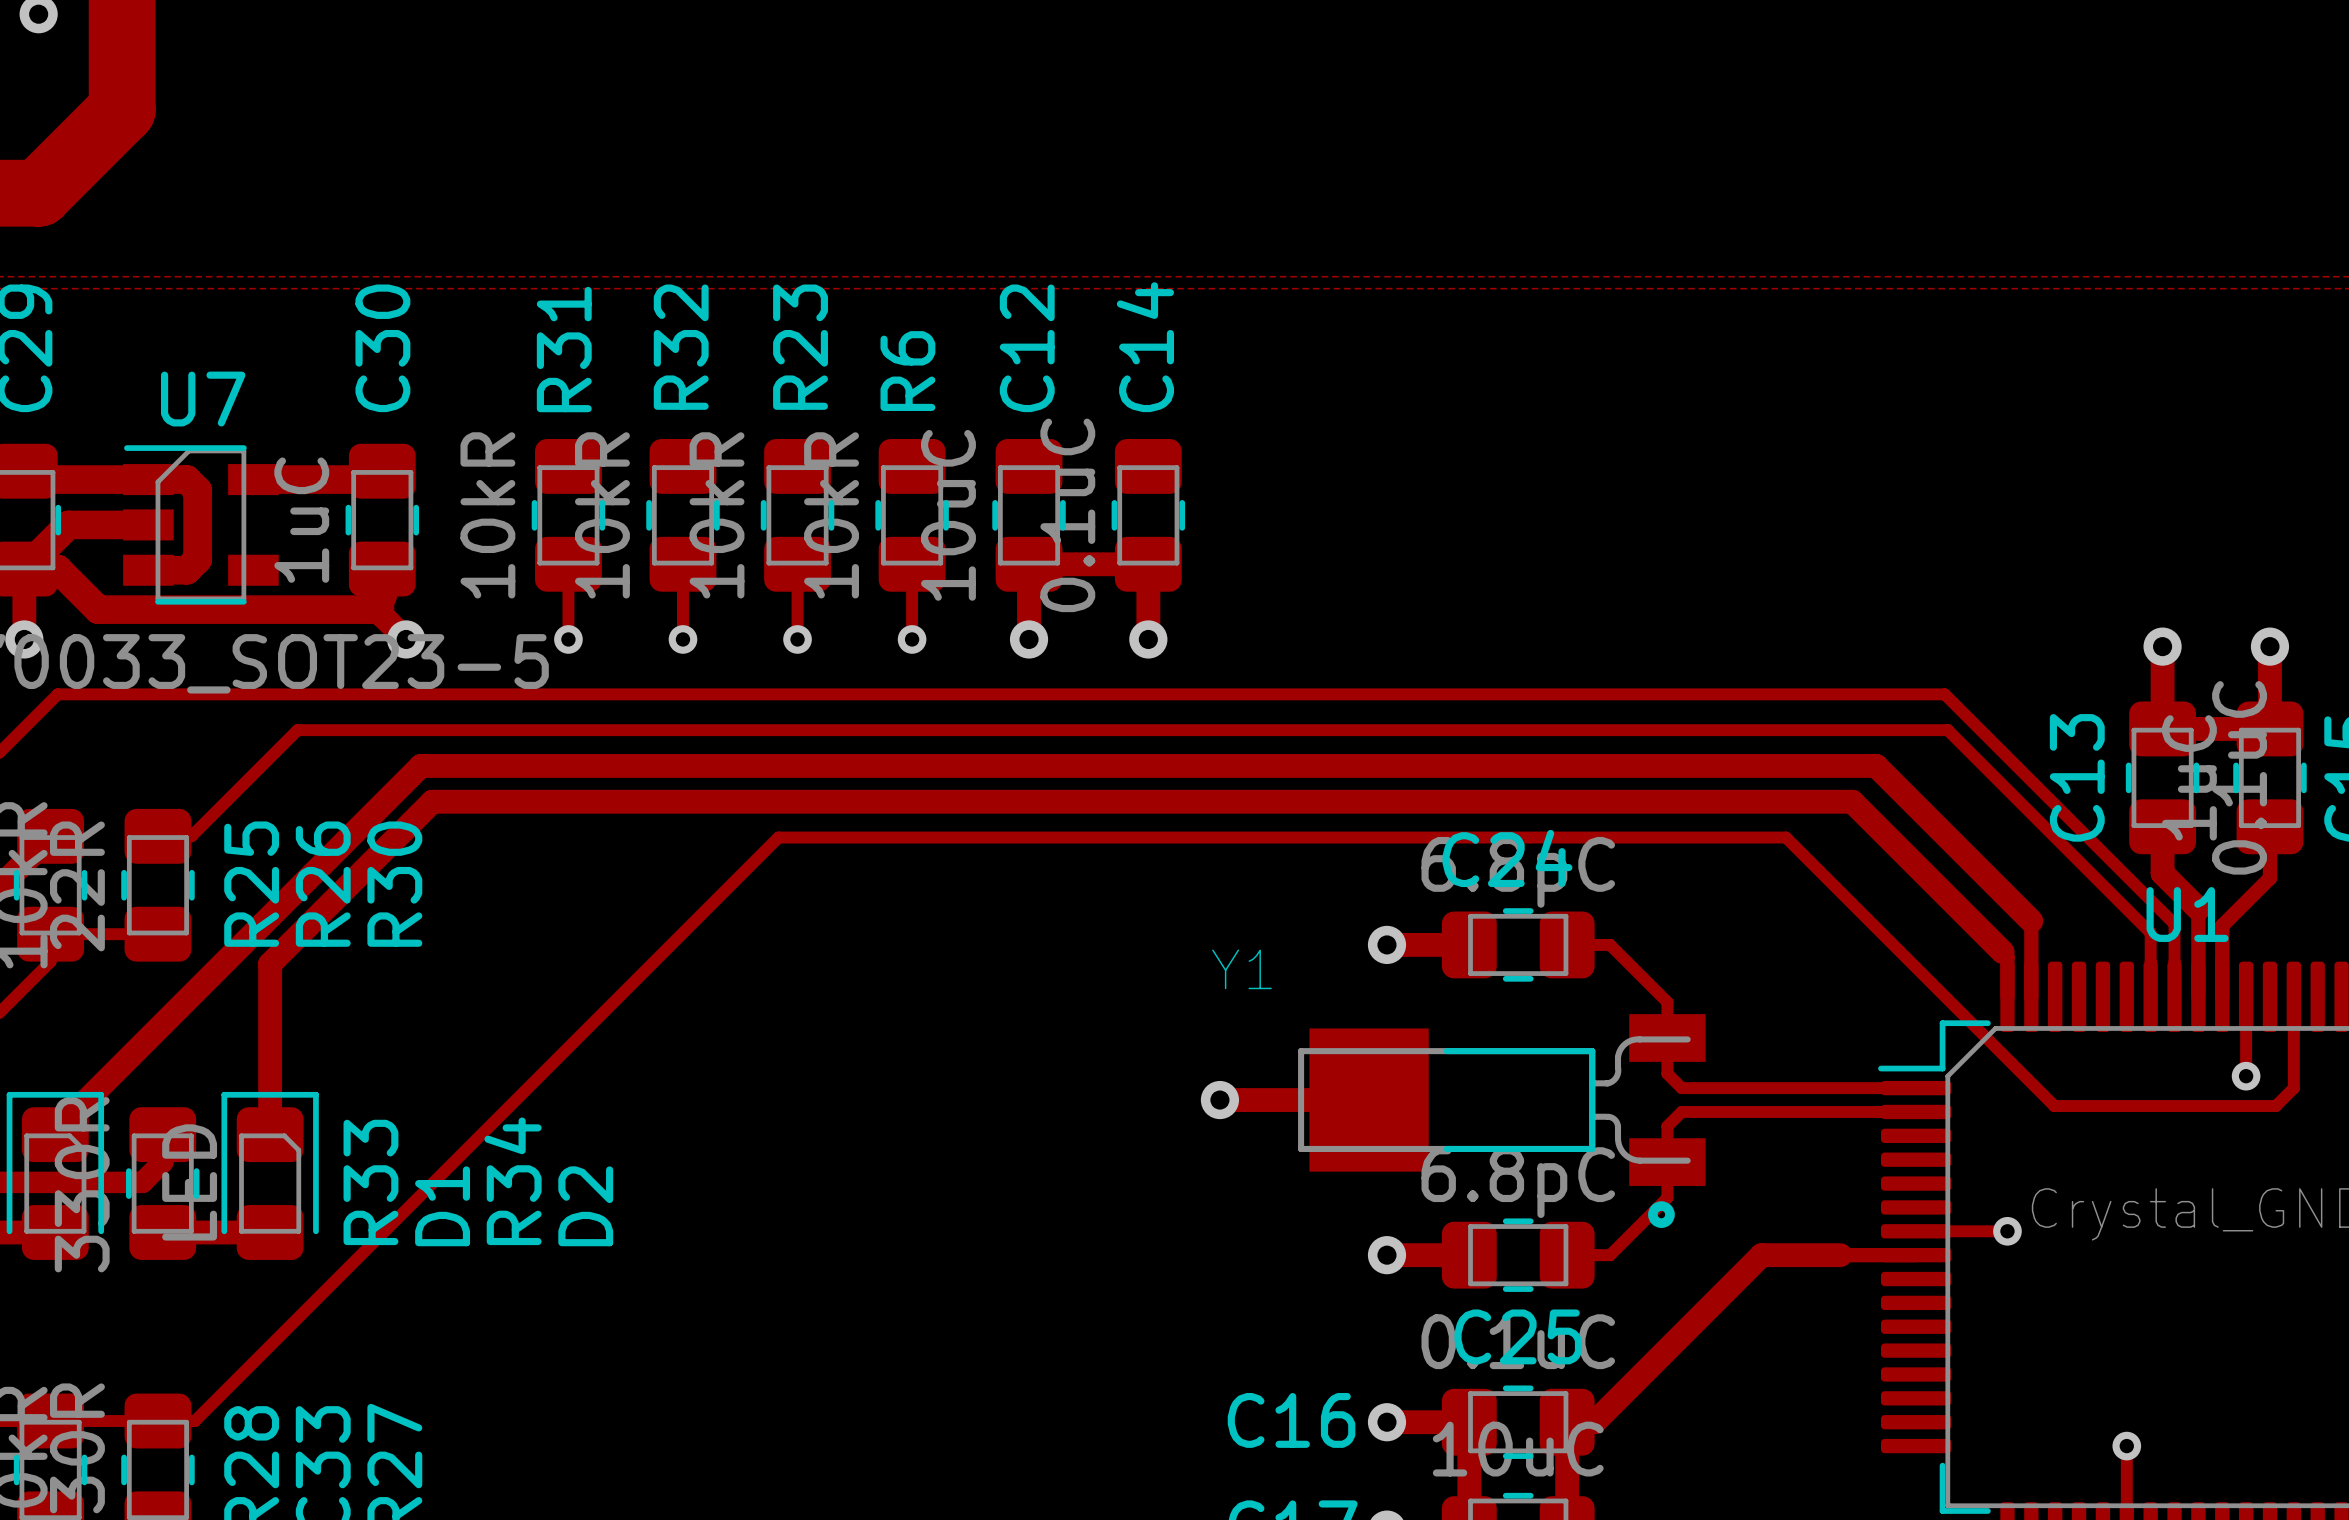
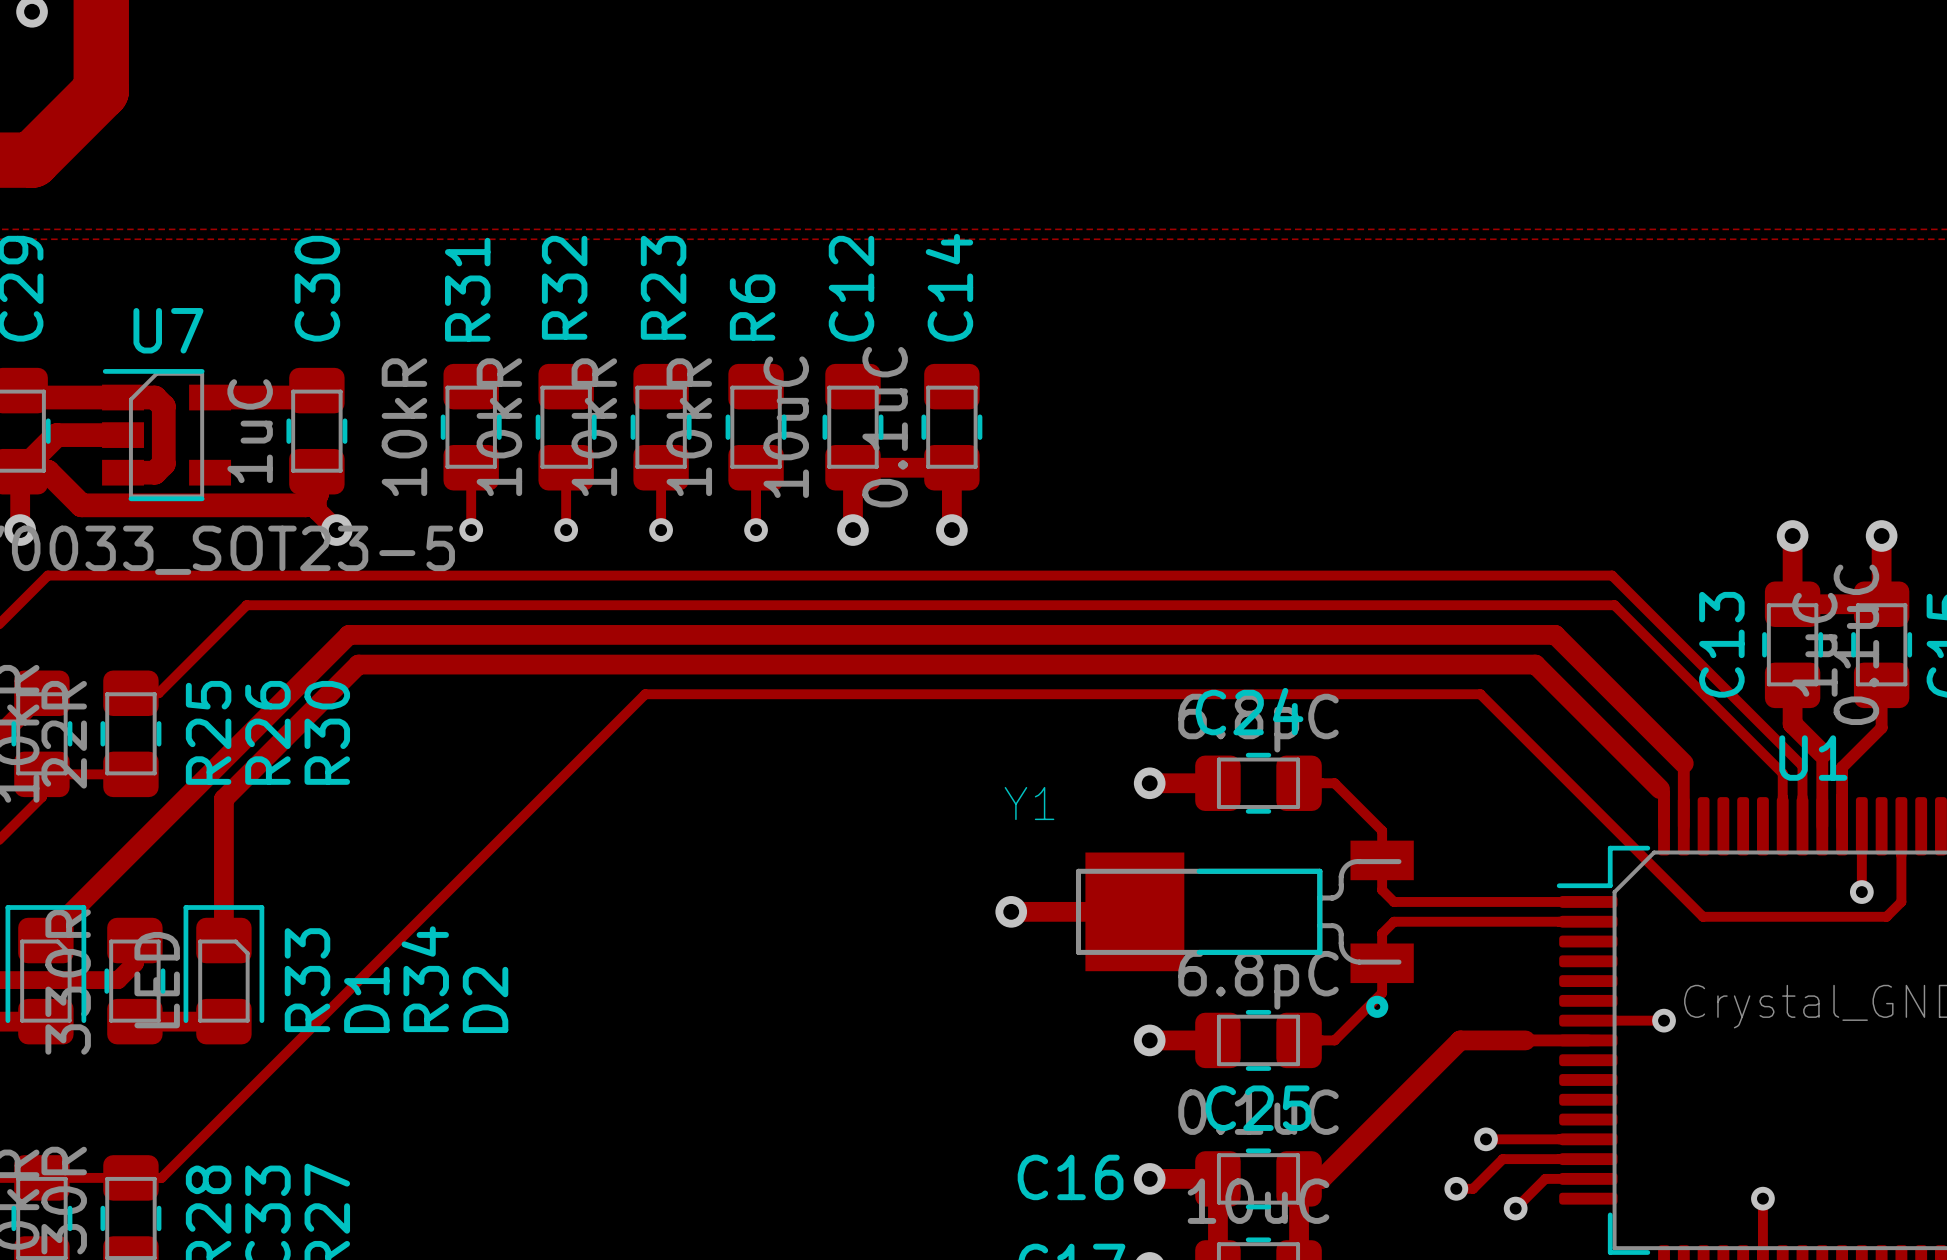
track: none -> (1485, 1139) (1588, 1139)
via: none -> (1485, 1139)
track: none -> (1588, 1159) (1502, 1159) (1473, 1188) (1456, 1188)
track: none -> (1588, 1178) (1545, 1178) (1515, 1208)
via: none -> (1456, 1188)
via: none -> (1515, 1208)

